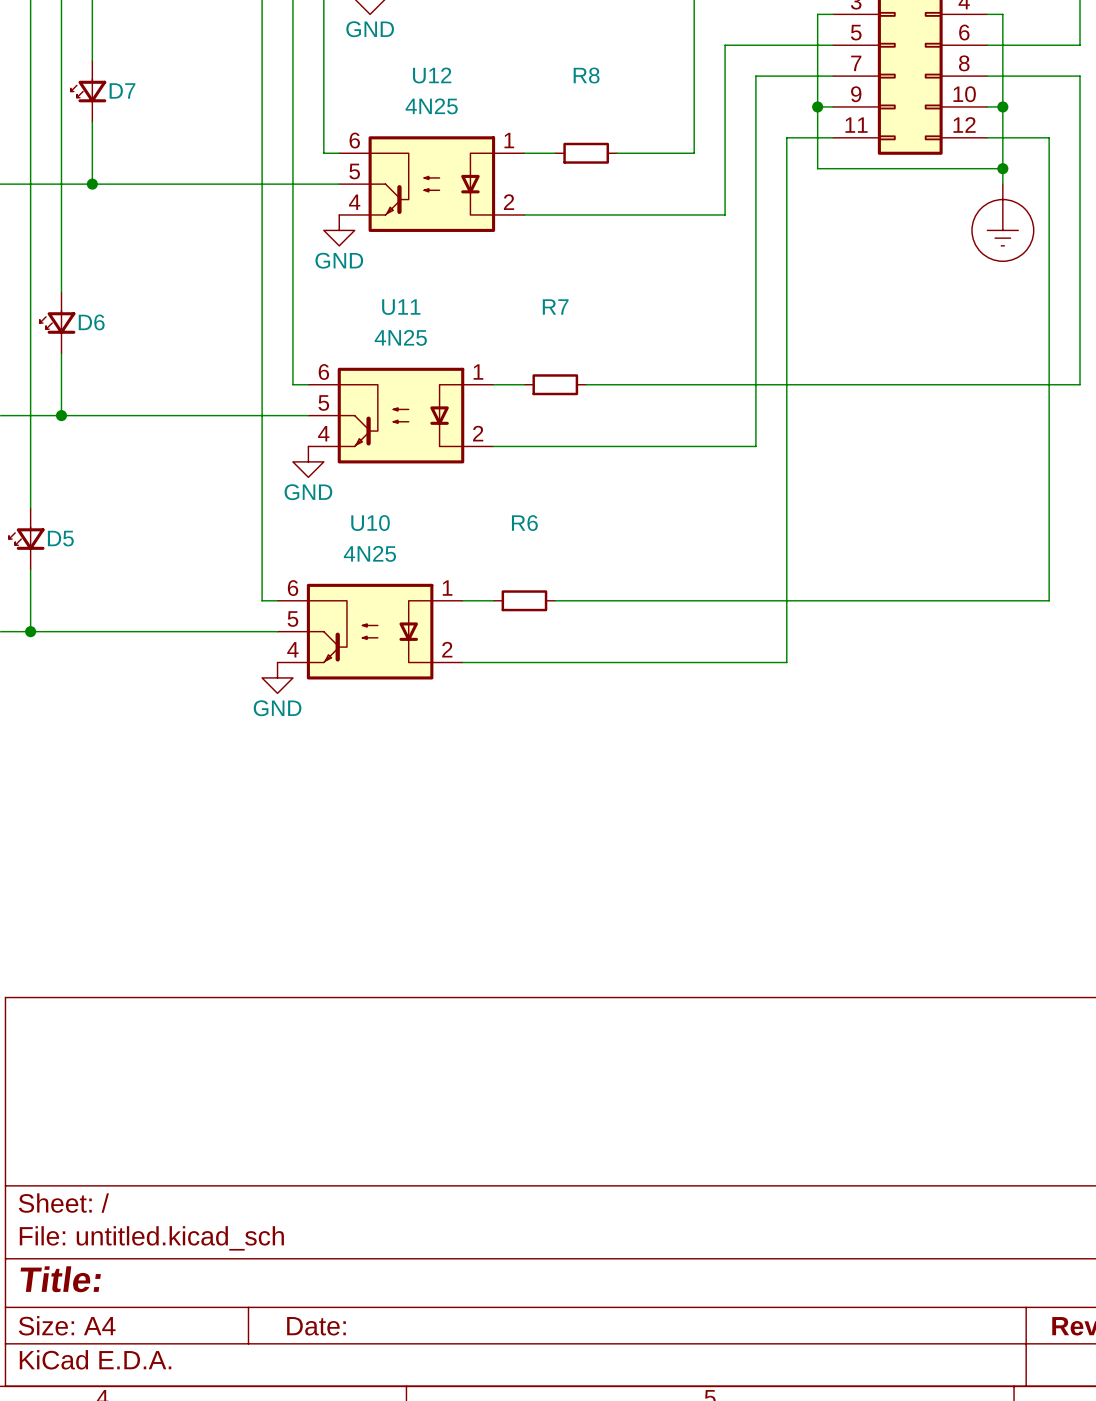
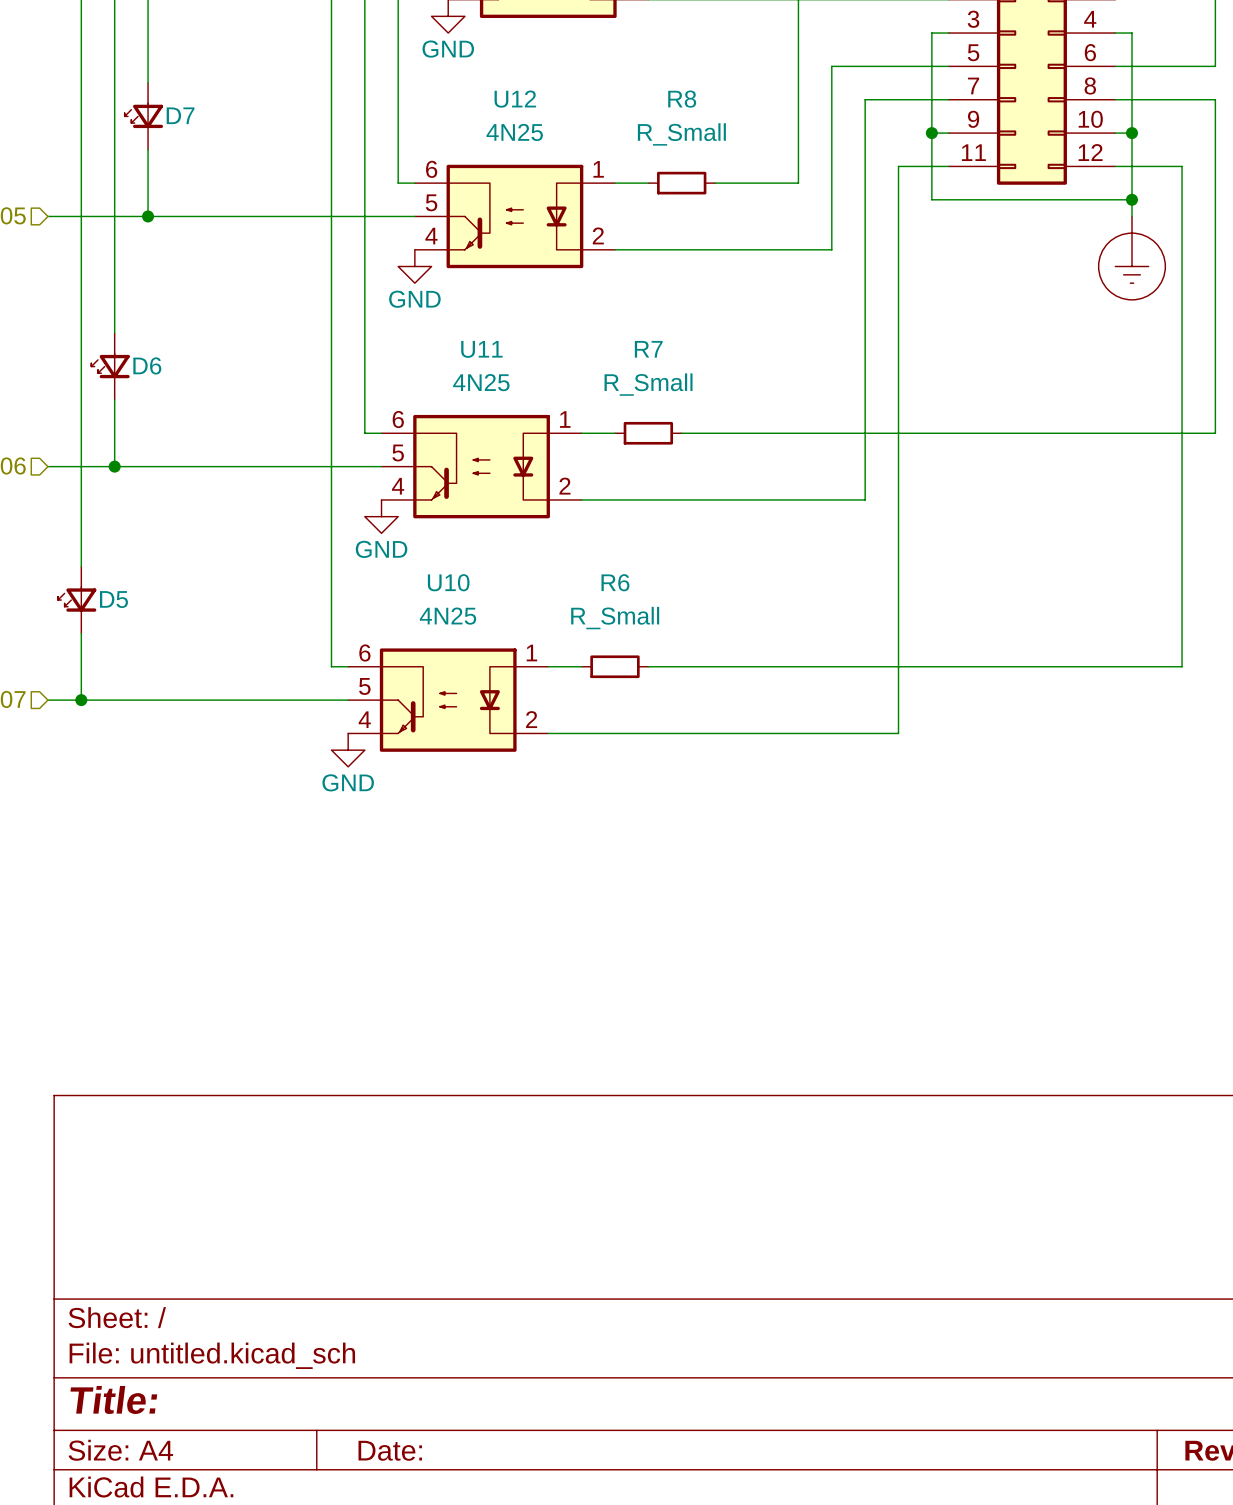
R8 value: none -> R_Small (681, 134)
R7 value: none -> R_Small (648, 384)
R6 value: none -> R_Small (615, 618)

